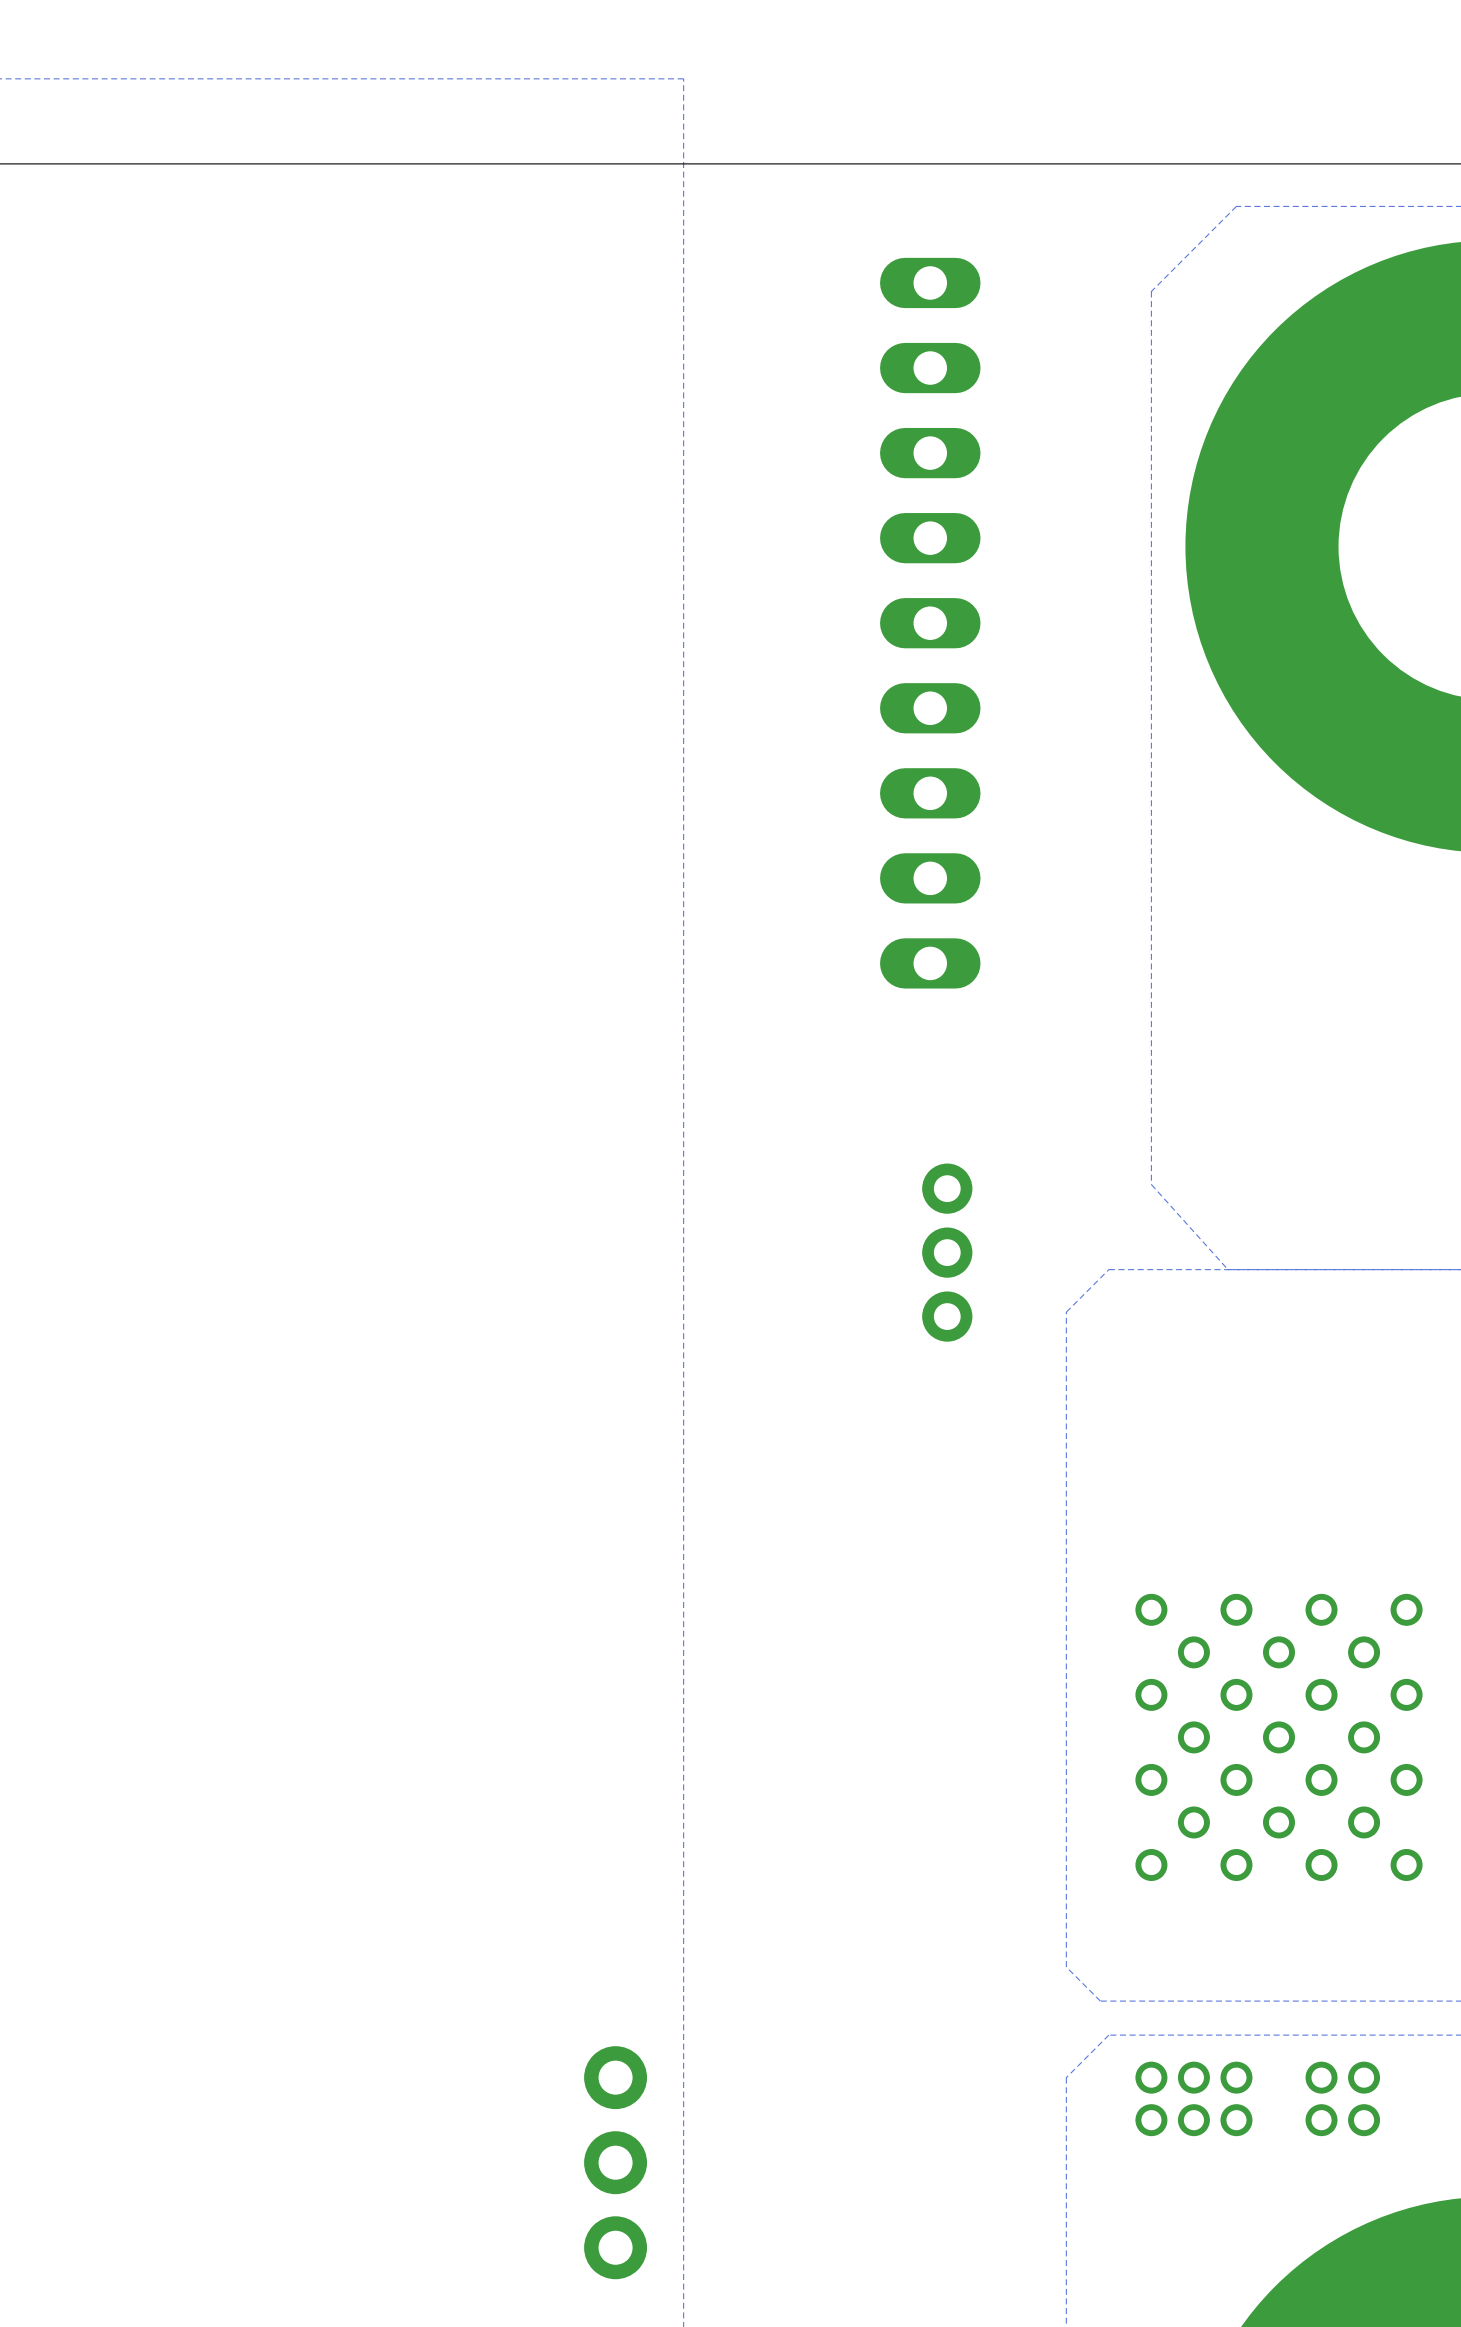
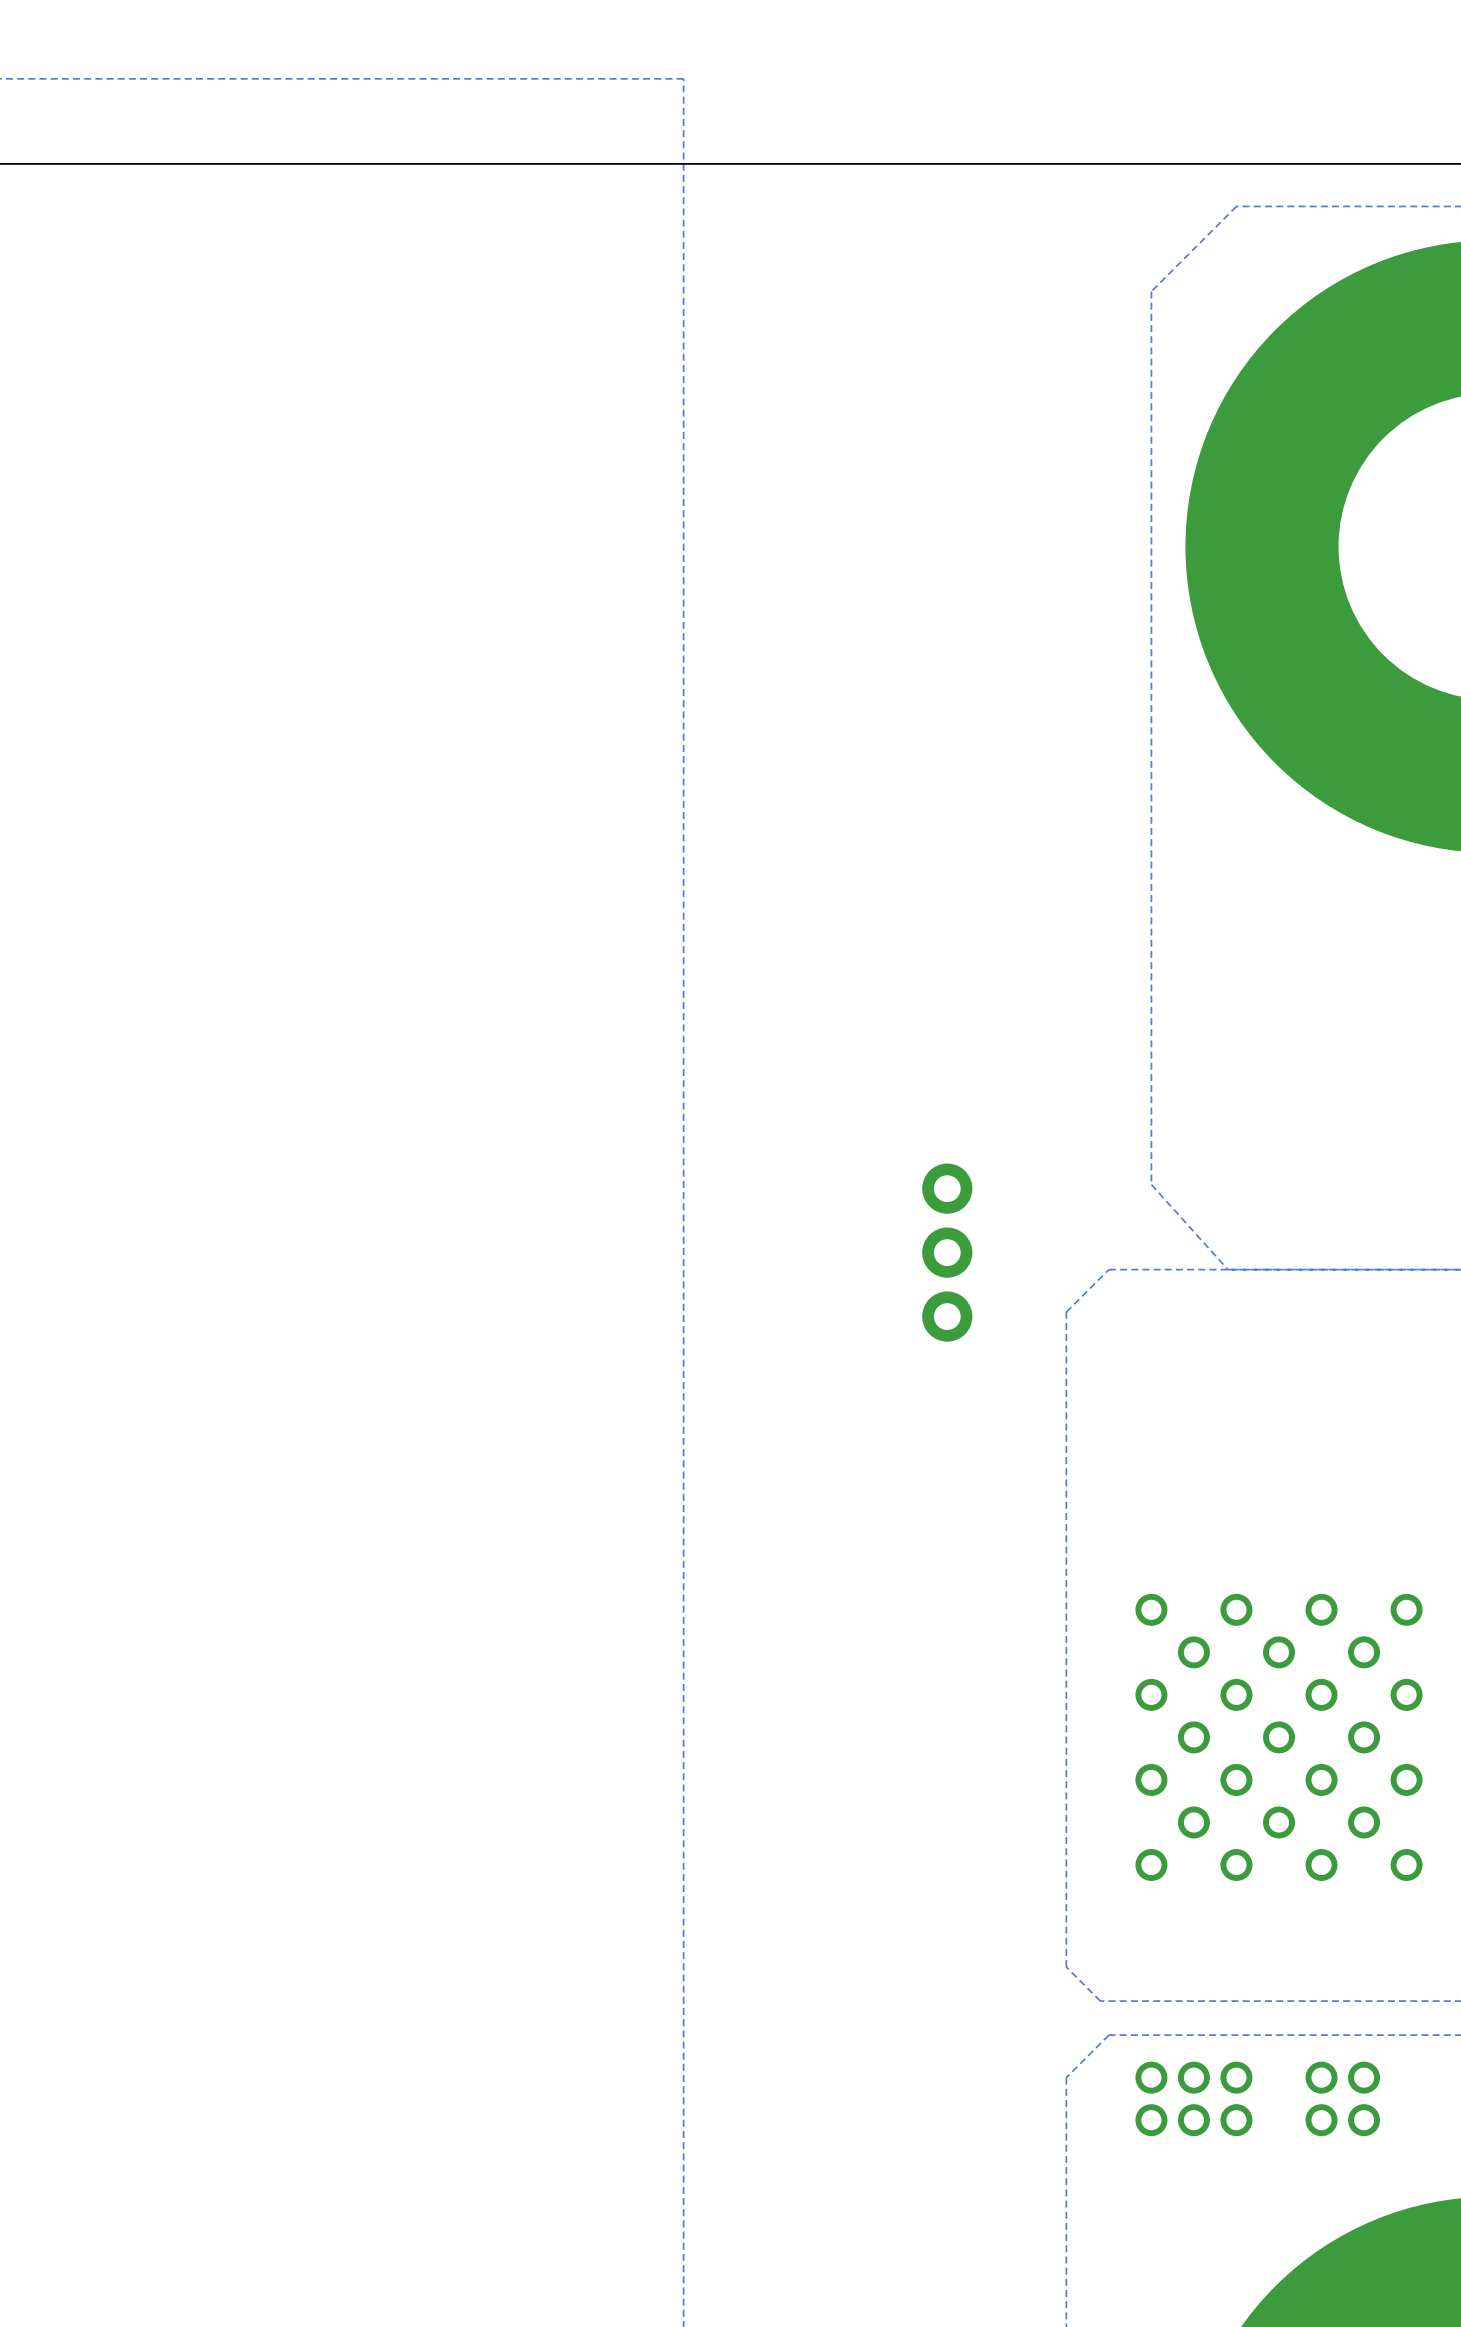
part: (930, 623) -> none
part: (615, 2162) -> none

